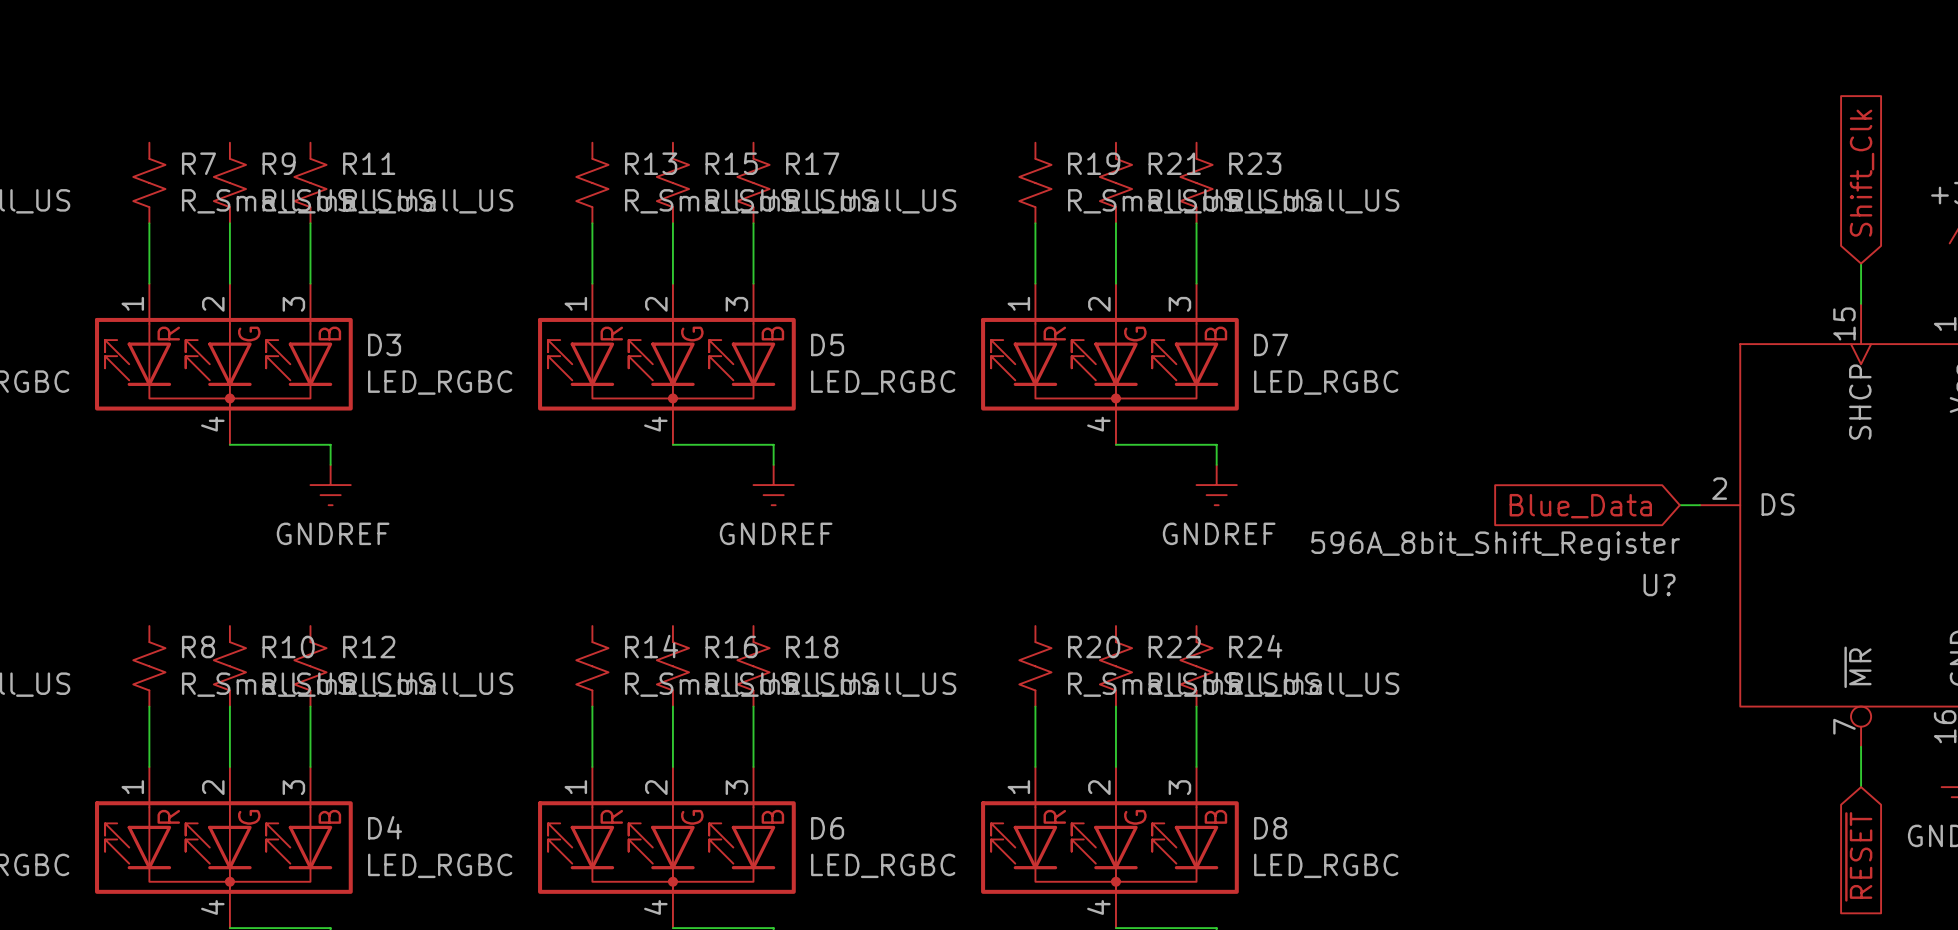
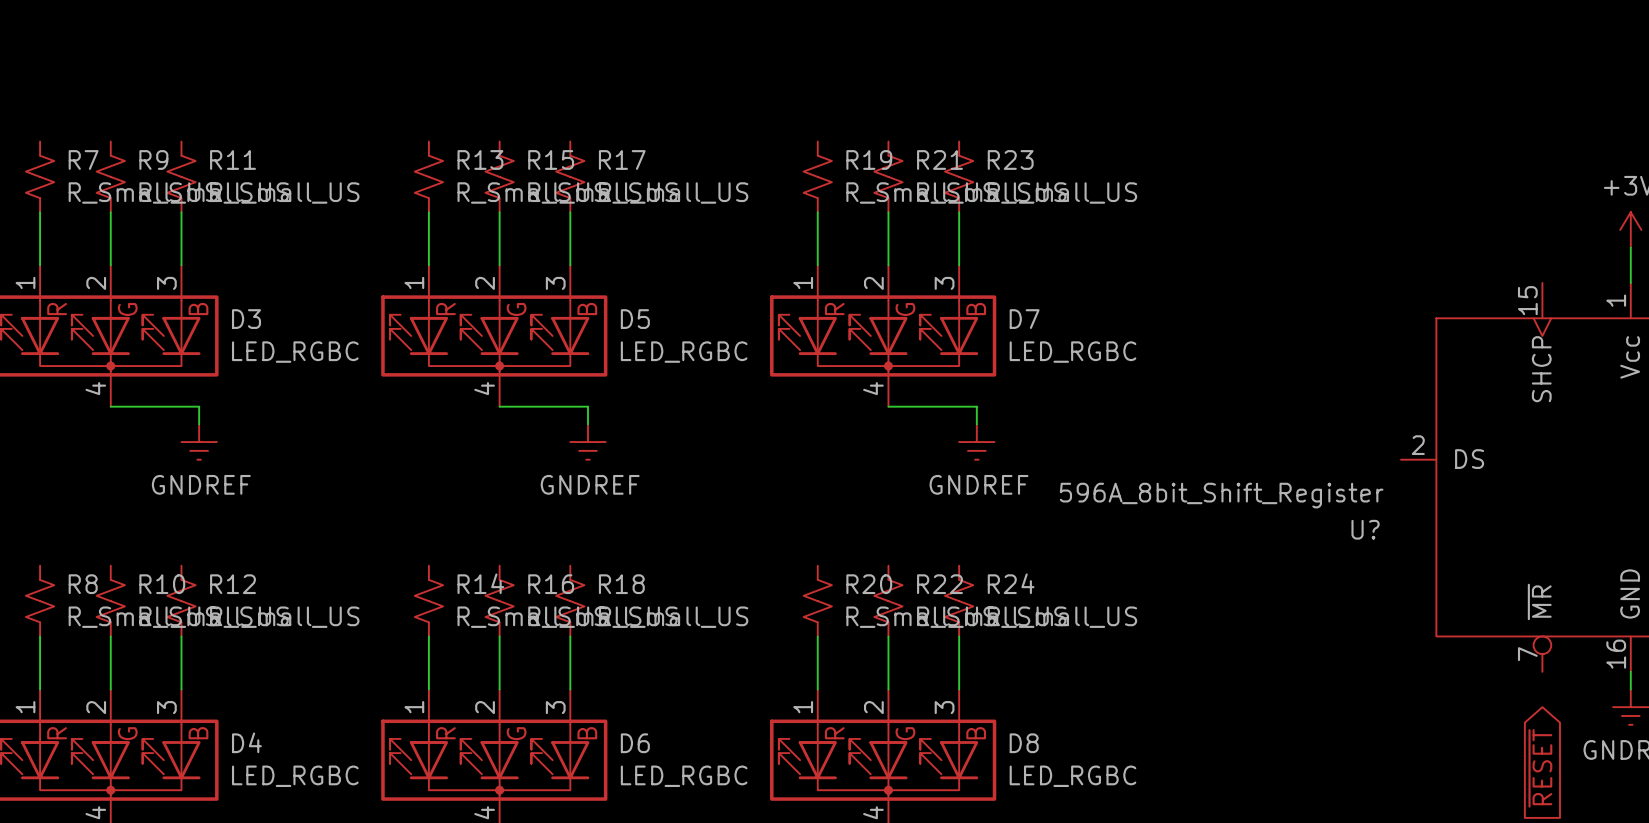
global label: Shift_Clk (1862, 173) -> none
wire: (1861, 263) (1861, 303) -> none
wire: (1679, 505) (1699, 505) -> none
global label: Blue_Data (1580, 506) -> none
wire: (1861, 746) (1861, 787) -> none

